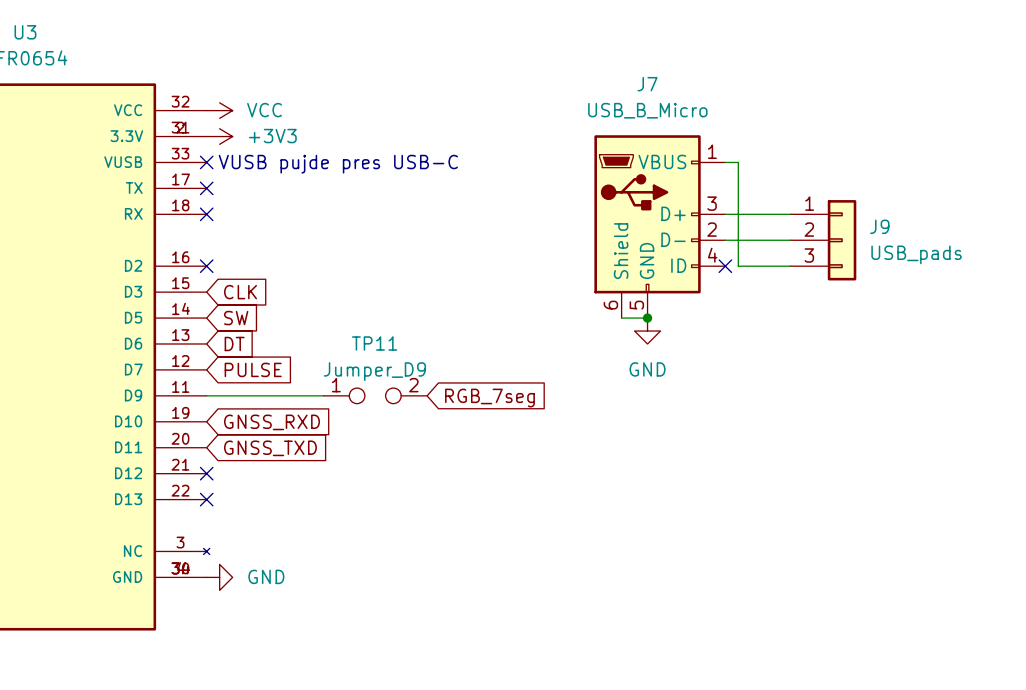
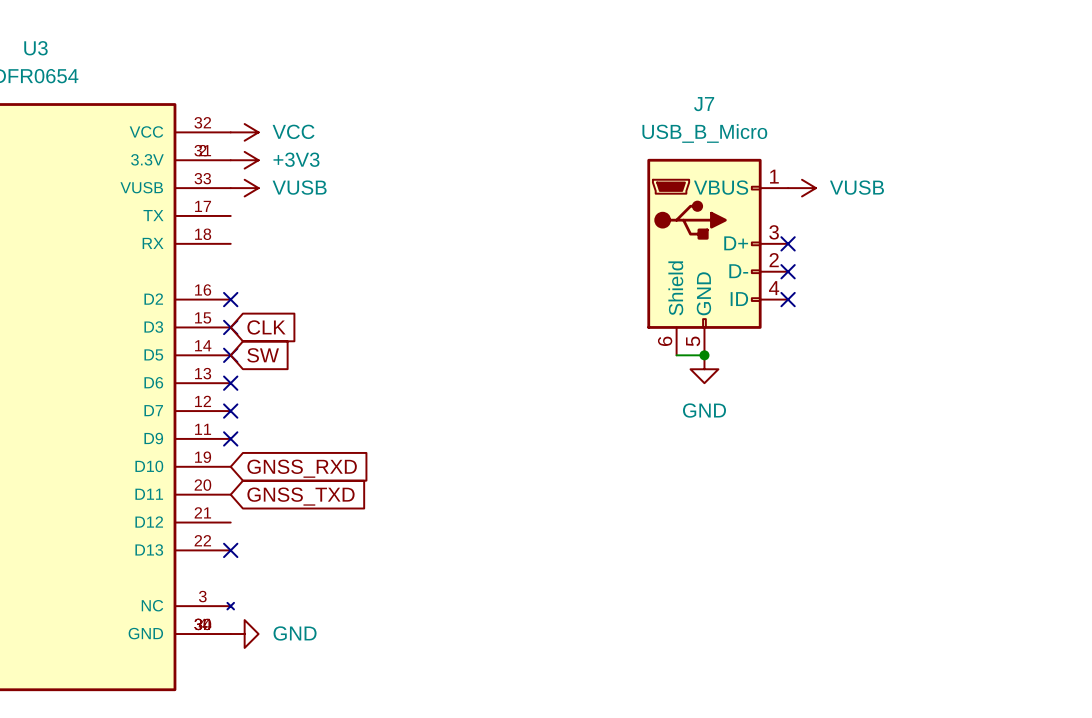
no-connect mark: (206, 162) -> none
power symbol: none -> VUSB (244, 188)
wire: (725, 162) (738, 162) (738, 266) (790, 266) -> none
power symbol: none -> VUSB (802, 188)
text: VUSB pujde pres USB-C (338, 164) -> none
no-connect mark: (206, 188) -> none
no-connect mark: (206, 214) -> none
wire: (725, 214) (790, 214) -> none
no-connect mark: none -> (788, 243)
wire: (725, 240) (790, 240) -> none
no-connect mark: none -> (788, 271)
J9: USB_pads (823, 240) -> none
no-connect mark: none -> (230, 327)
no-connect mark: none -> (230, 355)
no-connect mark: none -> (230, 383)
global label: DT (234, 343) -> none
no-connect mark: none -> (230, 411)
global label: PULSE (253, 369) -> none
wire: (206, 395) (323, 395) -> none
no-connect mark: none -> (230, 438)
TP11: Jumper_D9 (375, 395) -> none
global label: RGB_7seg (489, 398) -> none
no-connect mark: (206, 473) -> none

